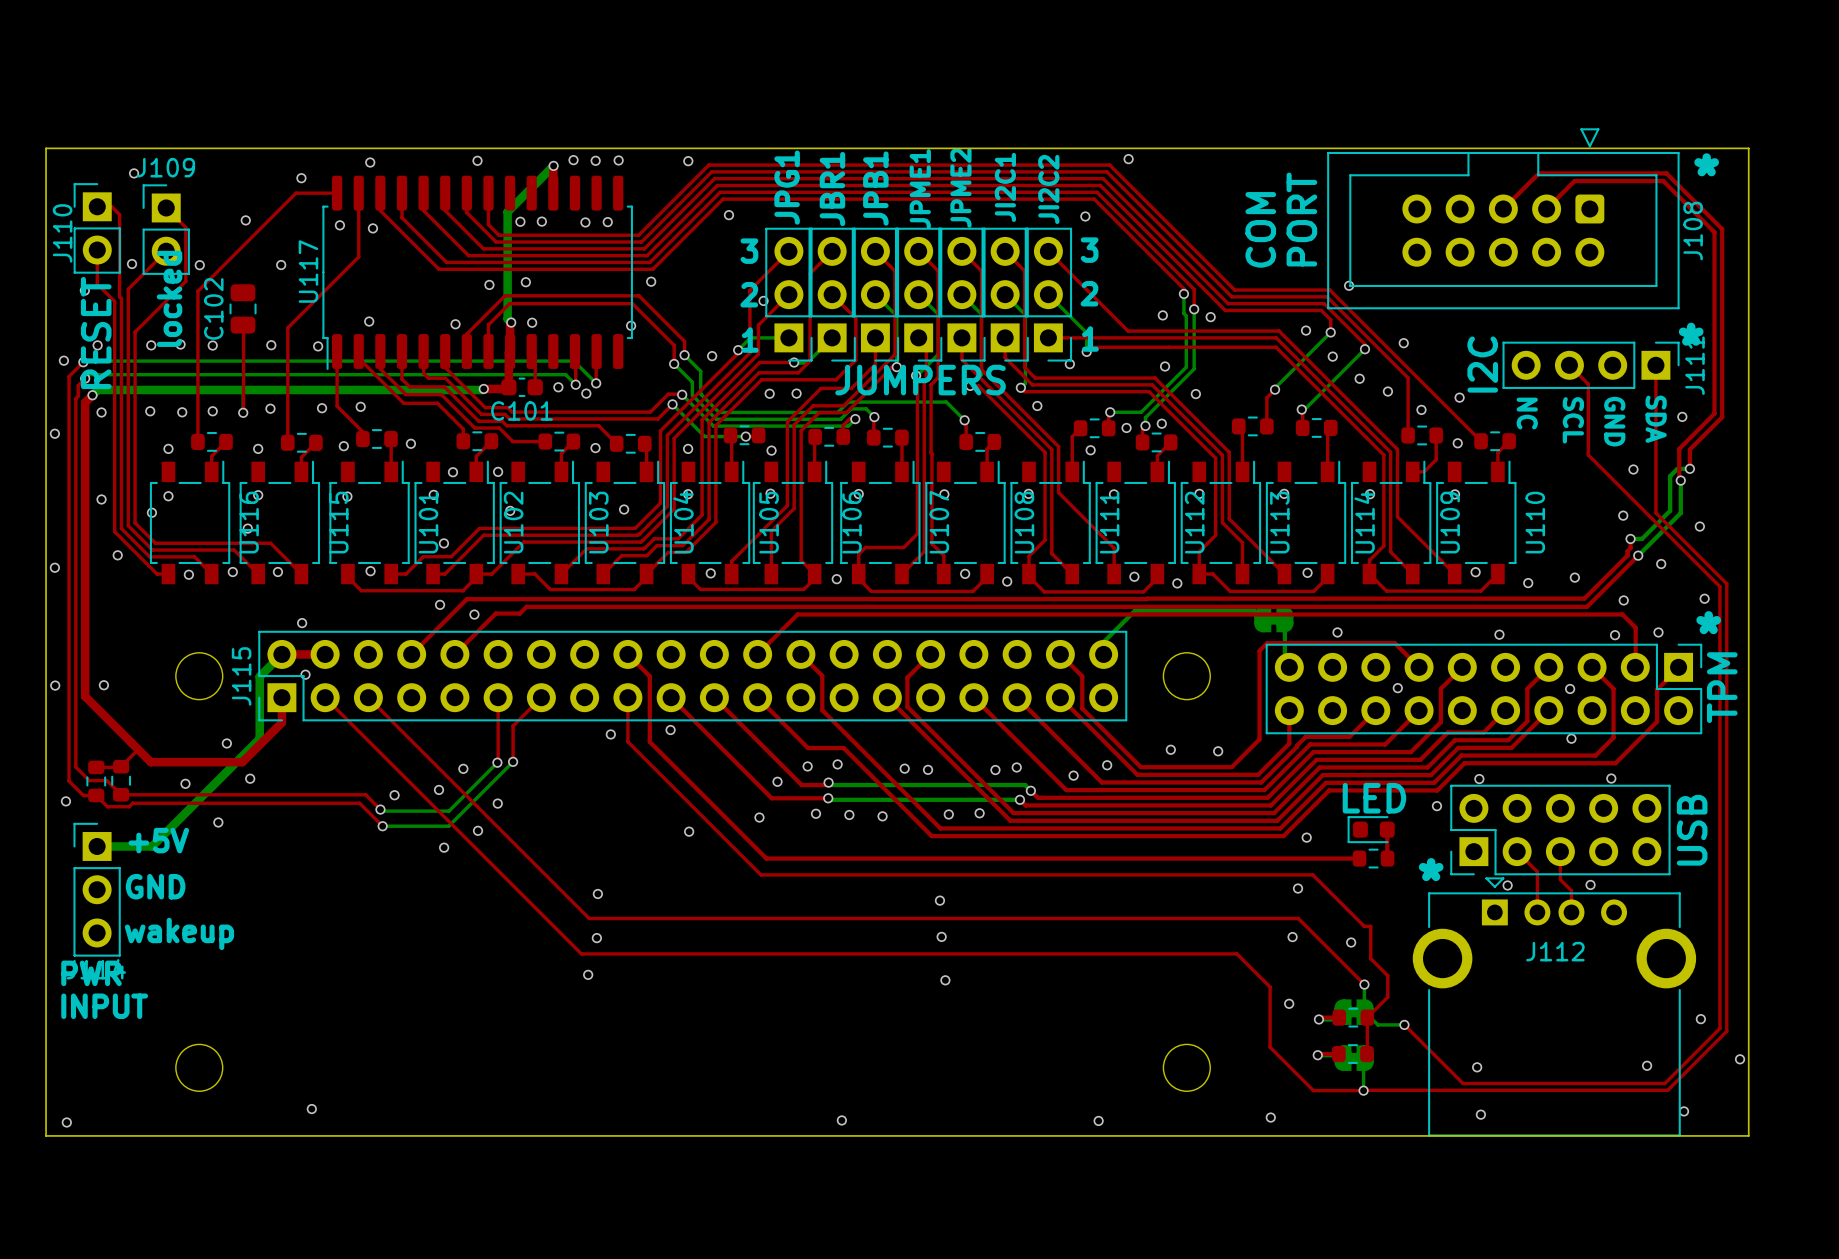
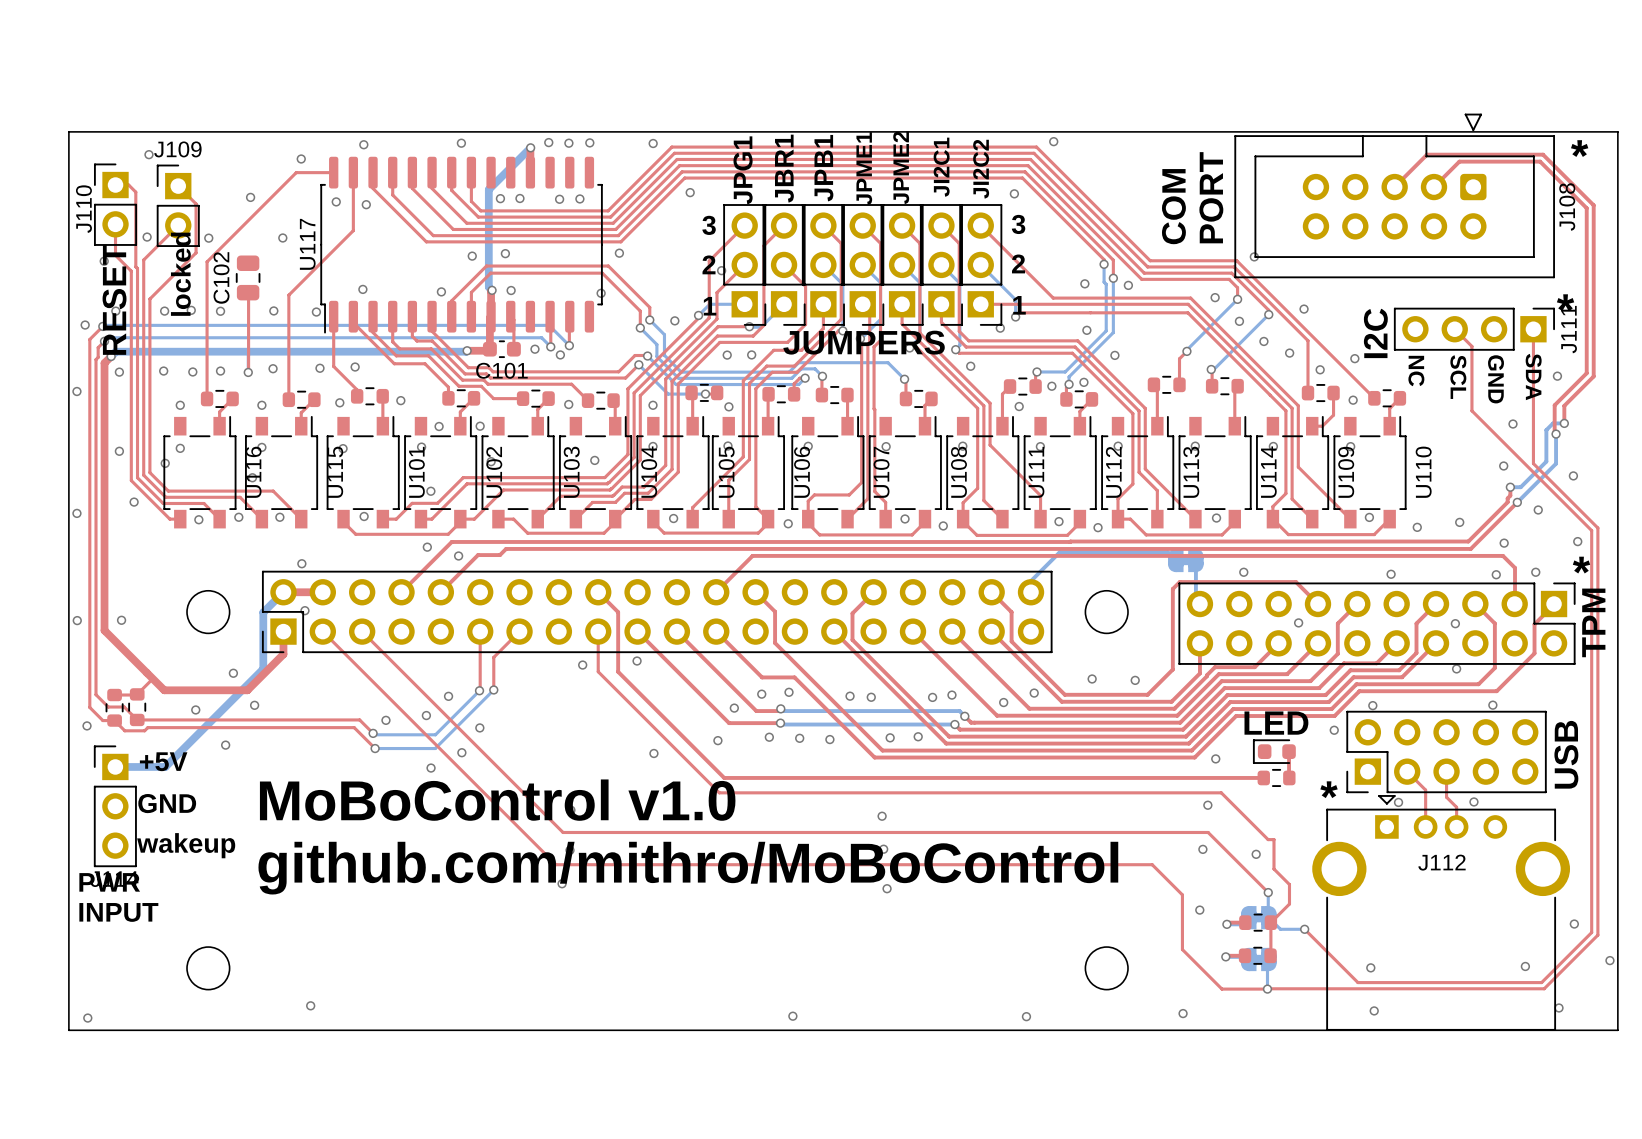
J115 name: J115 (241, 676) -> none
text: none -> MoBoControl v1.0 (497, 800)
text: none -> github.com/mithro/MoBoControl (688, 868)

